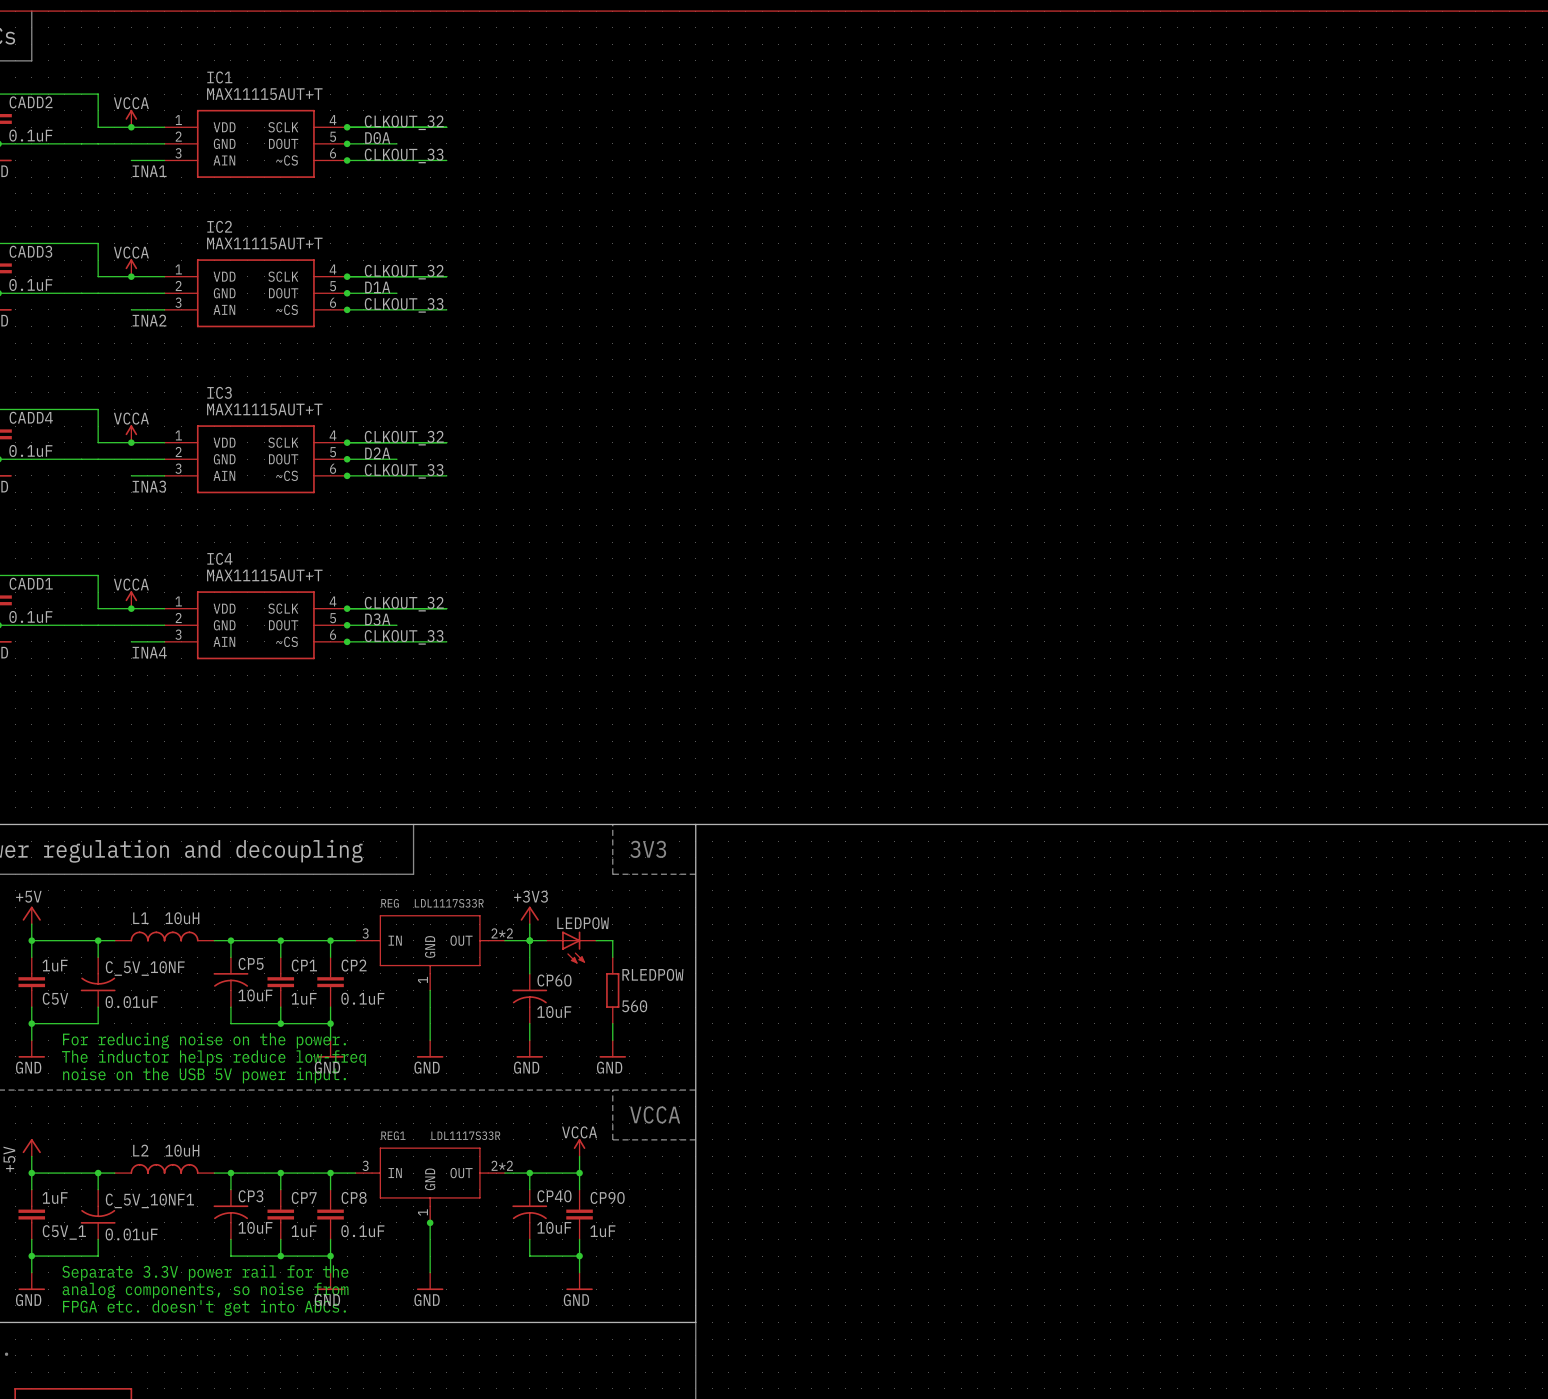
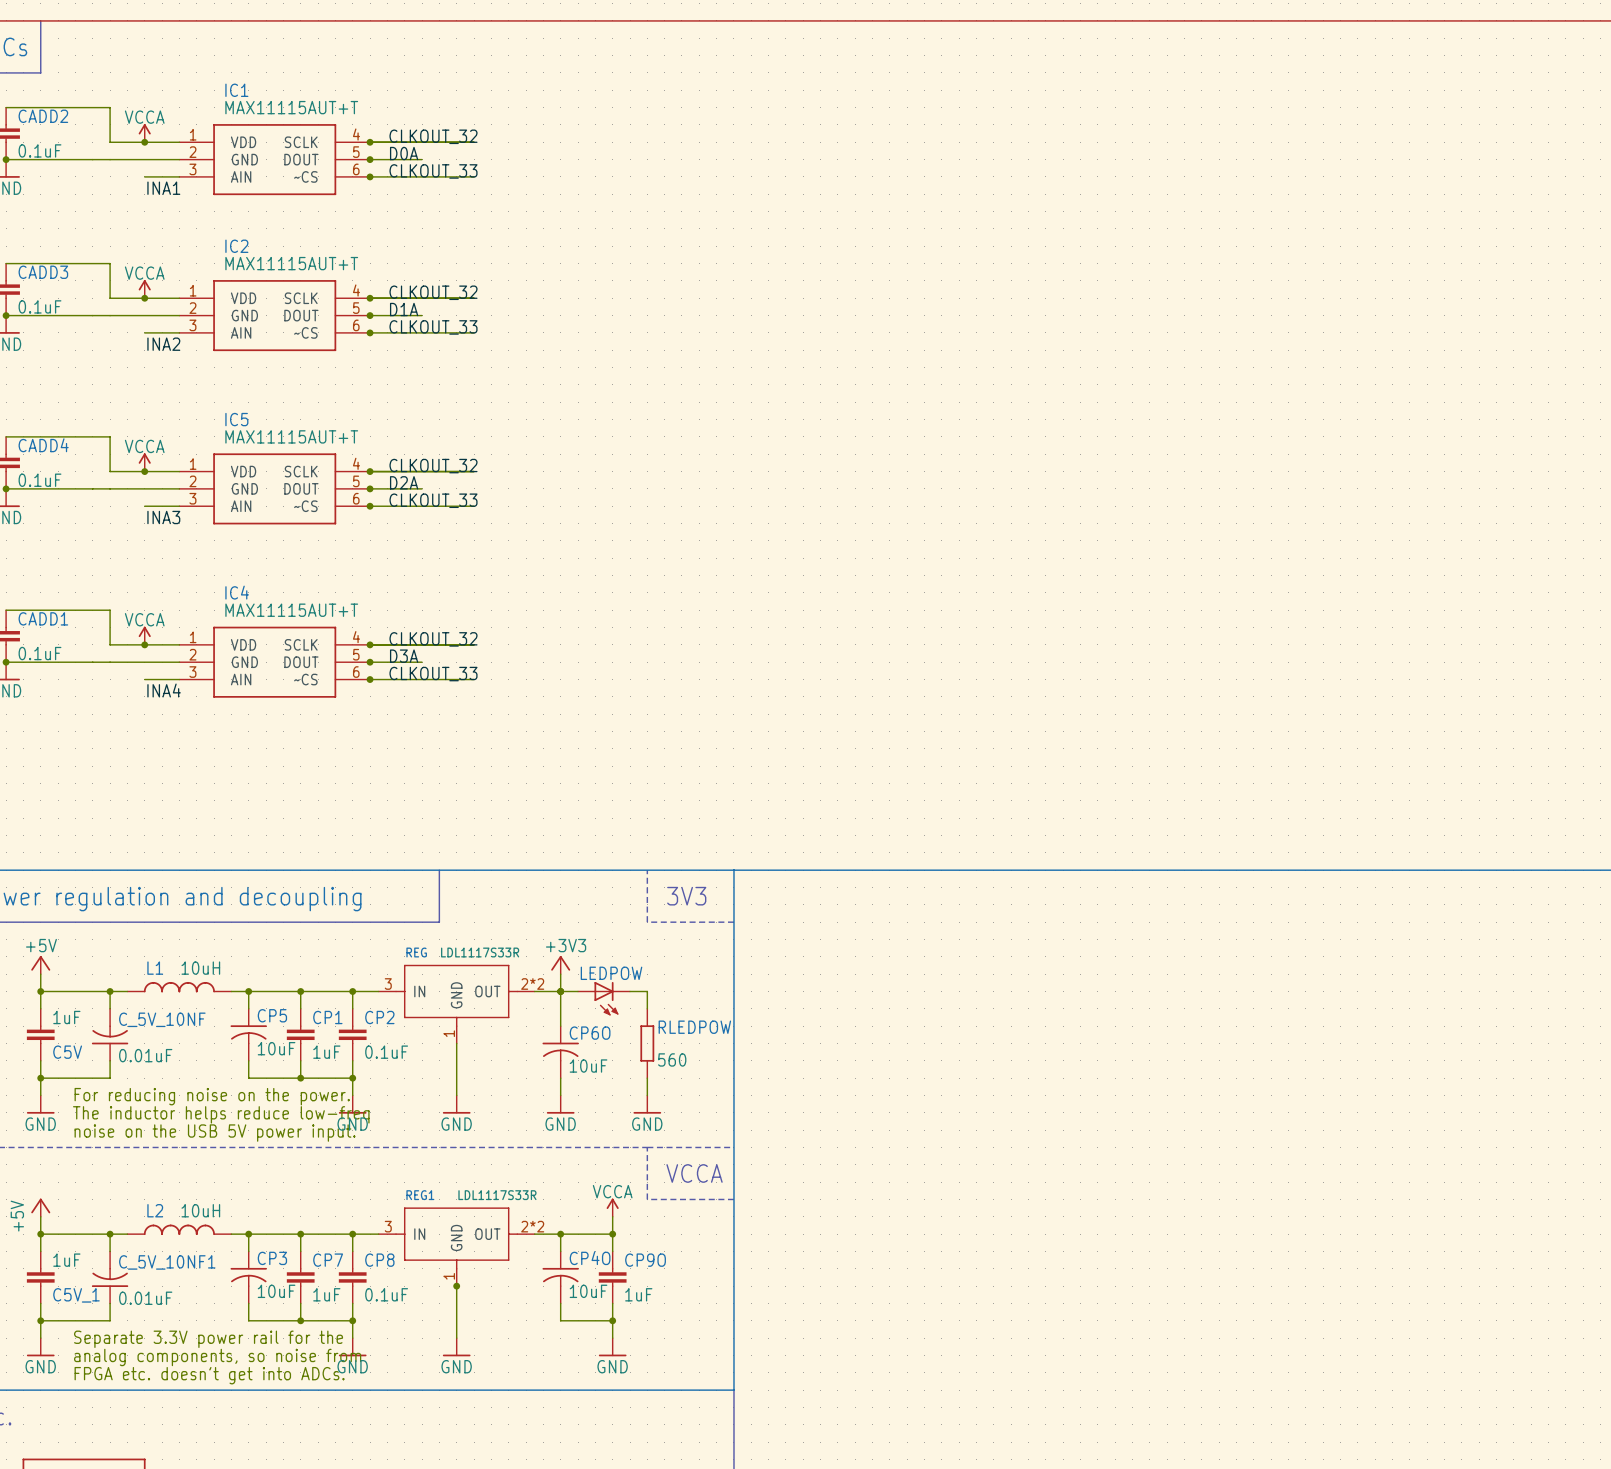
IC3 name: IC3 (219, 392) -> IC5 (236, 419)

